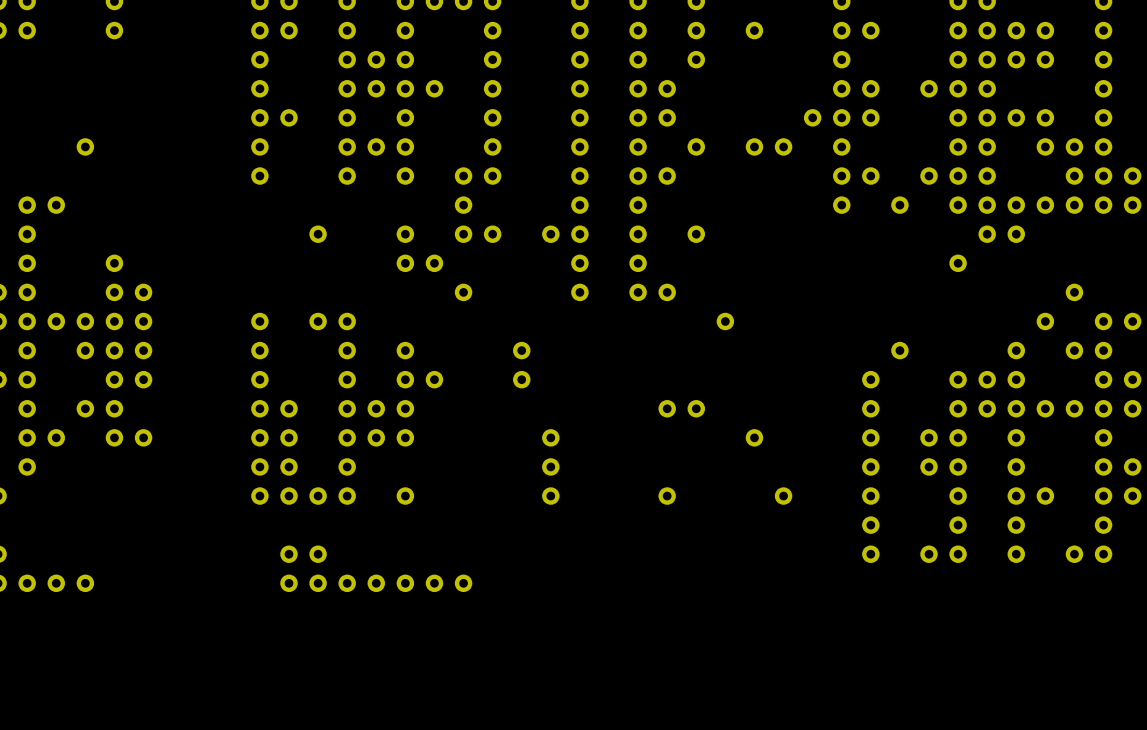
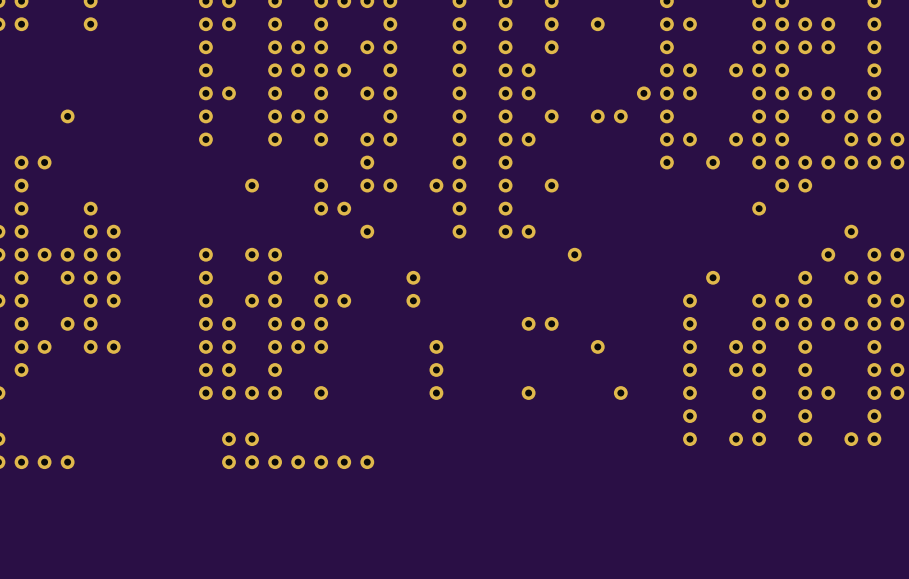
part: none -> (367, 47)
part: none -> (367, 93)
part: none -> (252, 300)

